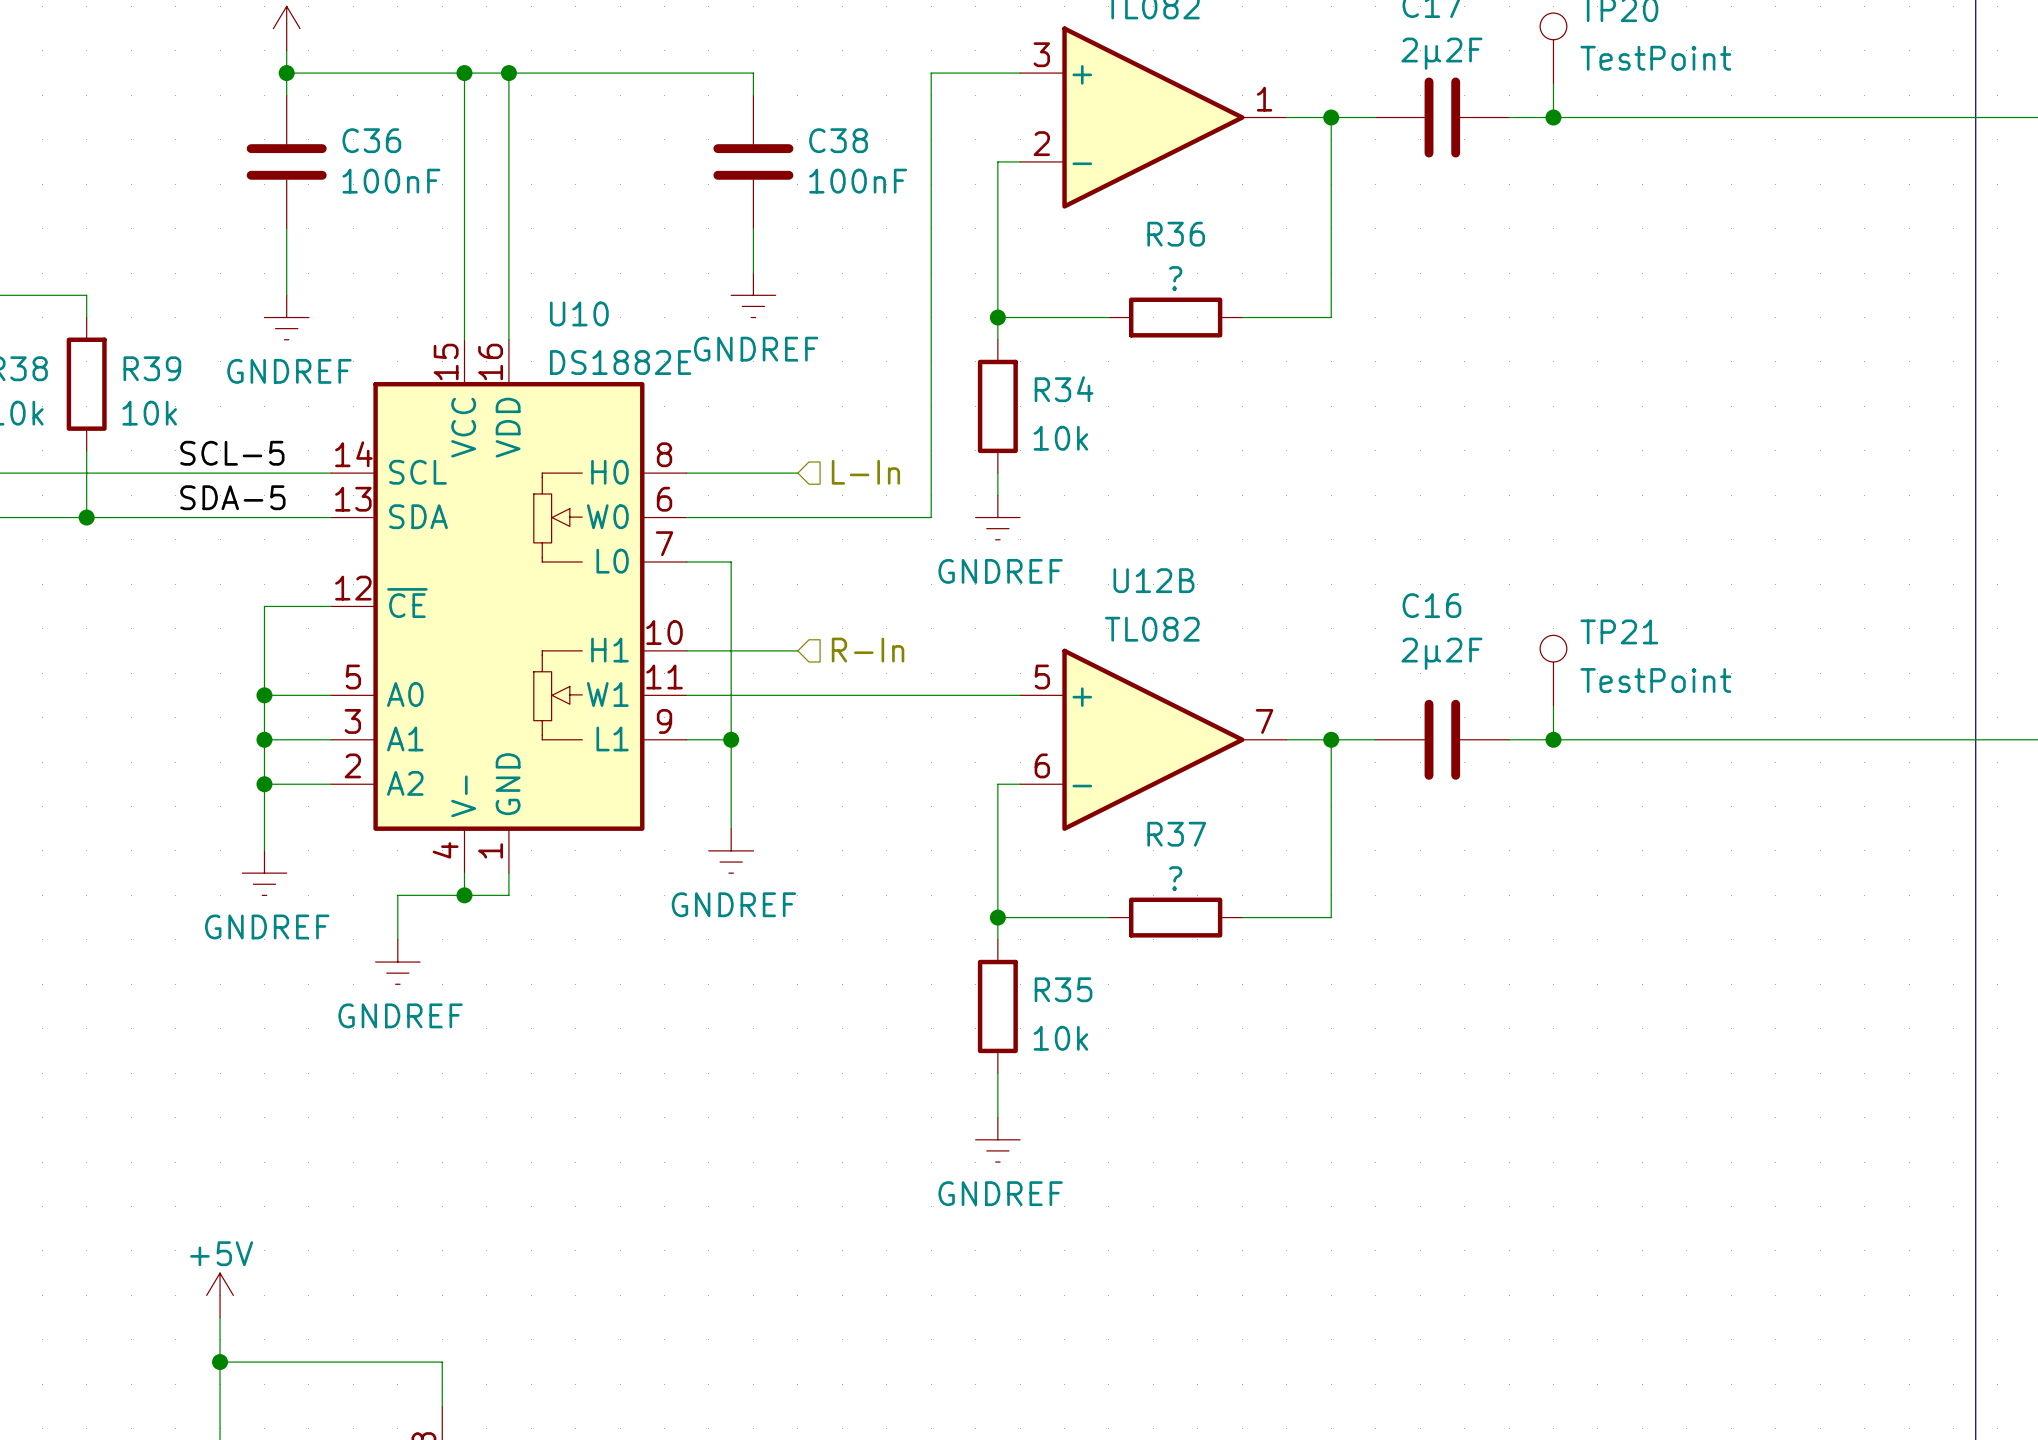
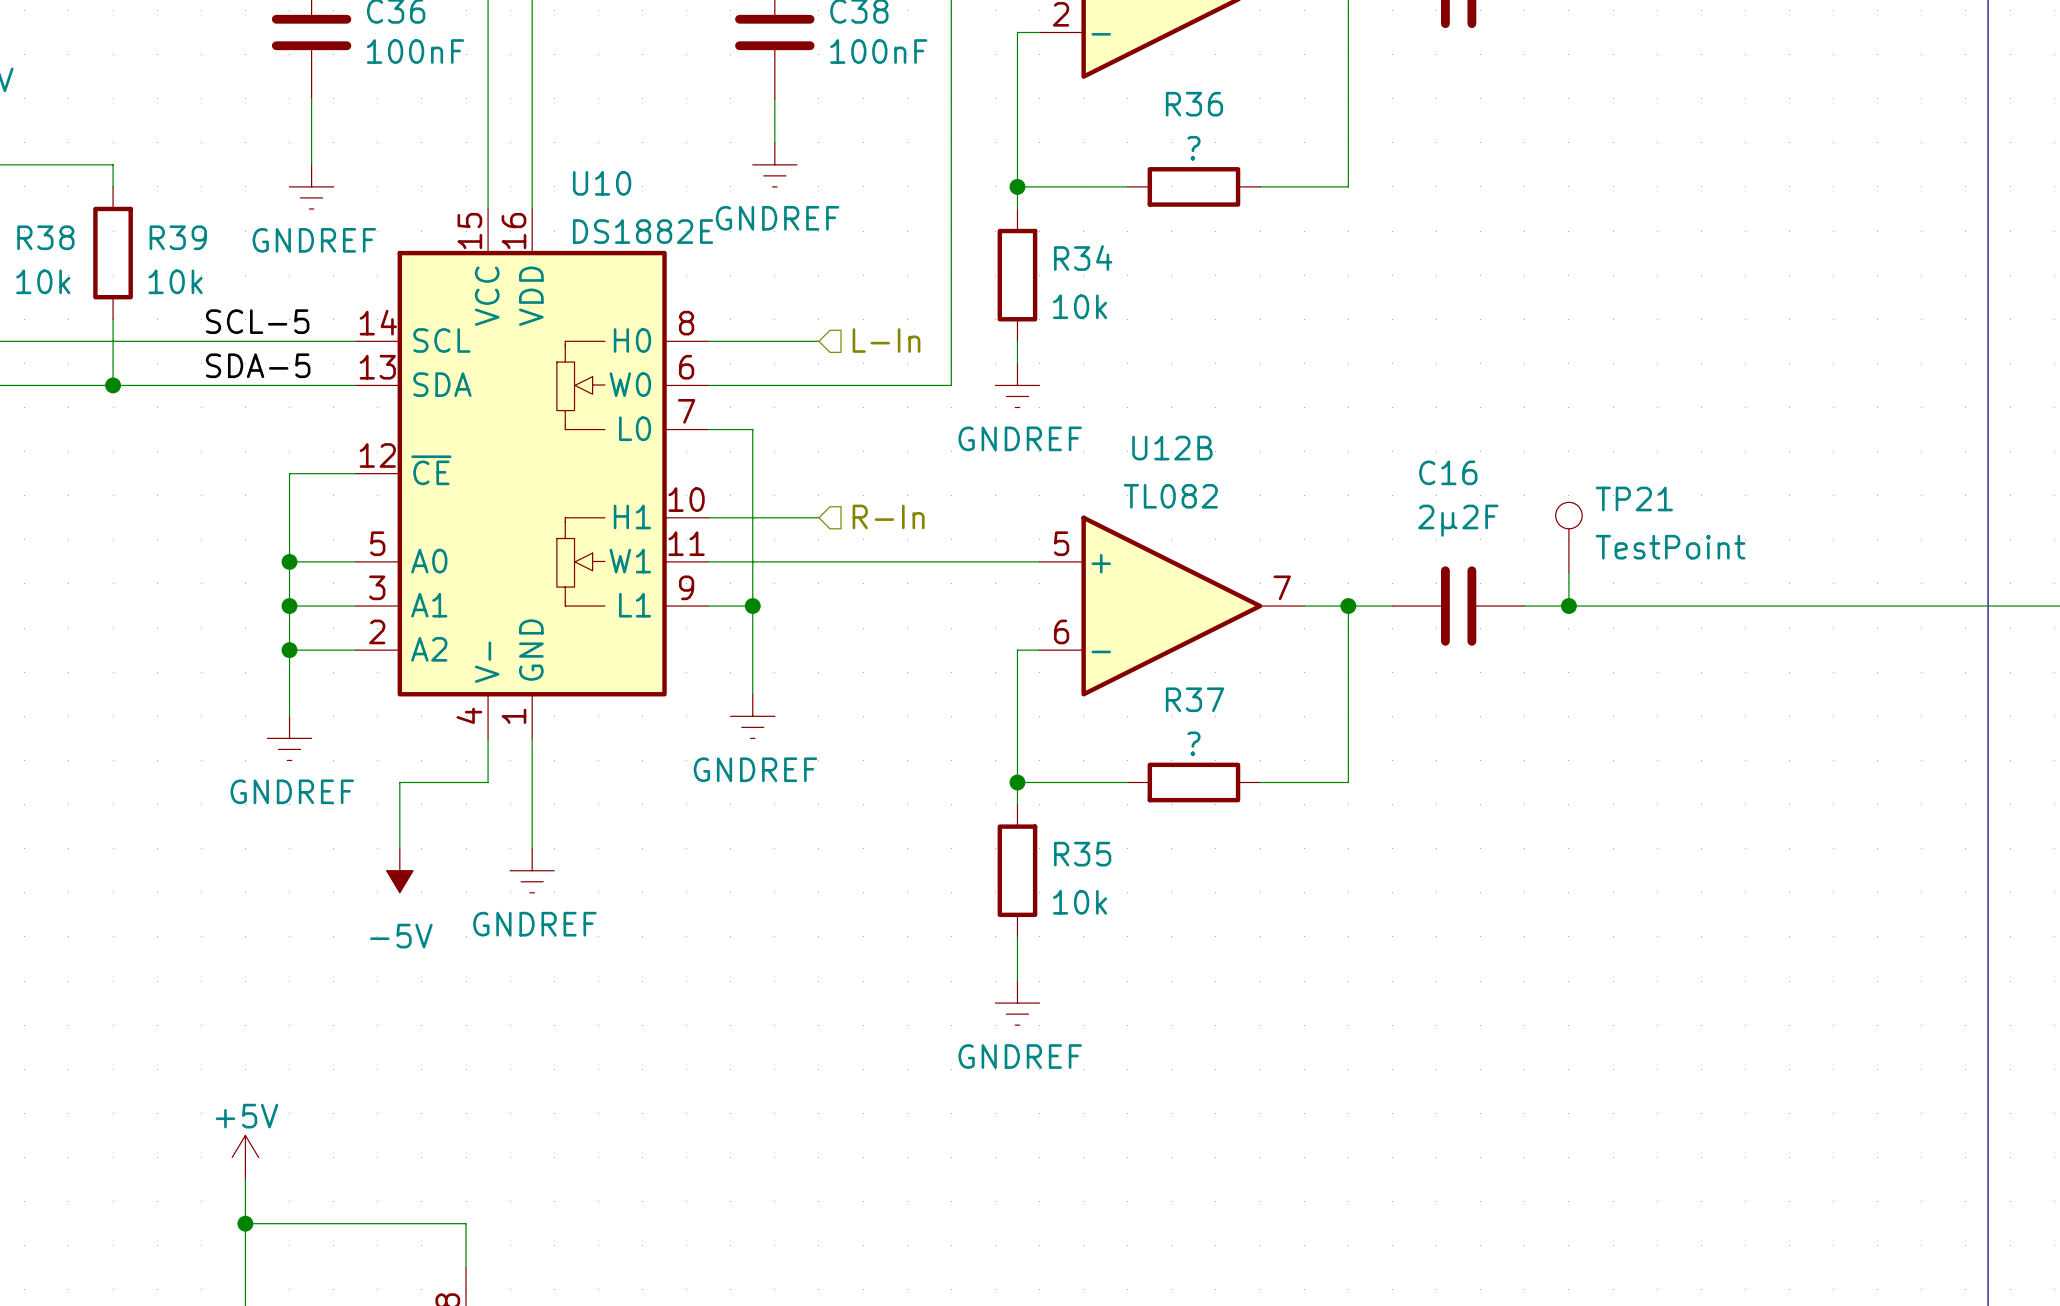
wire: none -> (488, 760) (488, 782) (399, 782) (399, 848)
junction: (464, 895) -> none
wire: (508, 895) (397, 895) (397, 939) -> (532, 760) (532, 848)
power symbol position: GNDREF (397, 962) -> GNDREF (532, 870)
power symbol: none -> -5V (399, 870)

